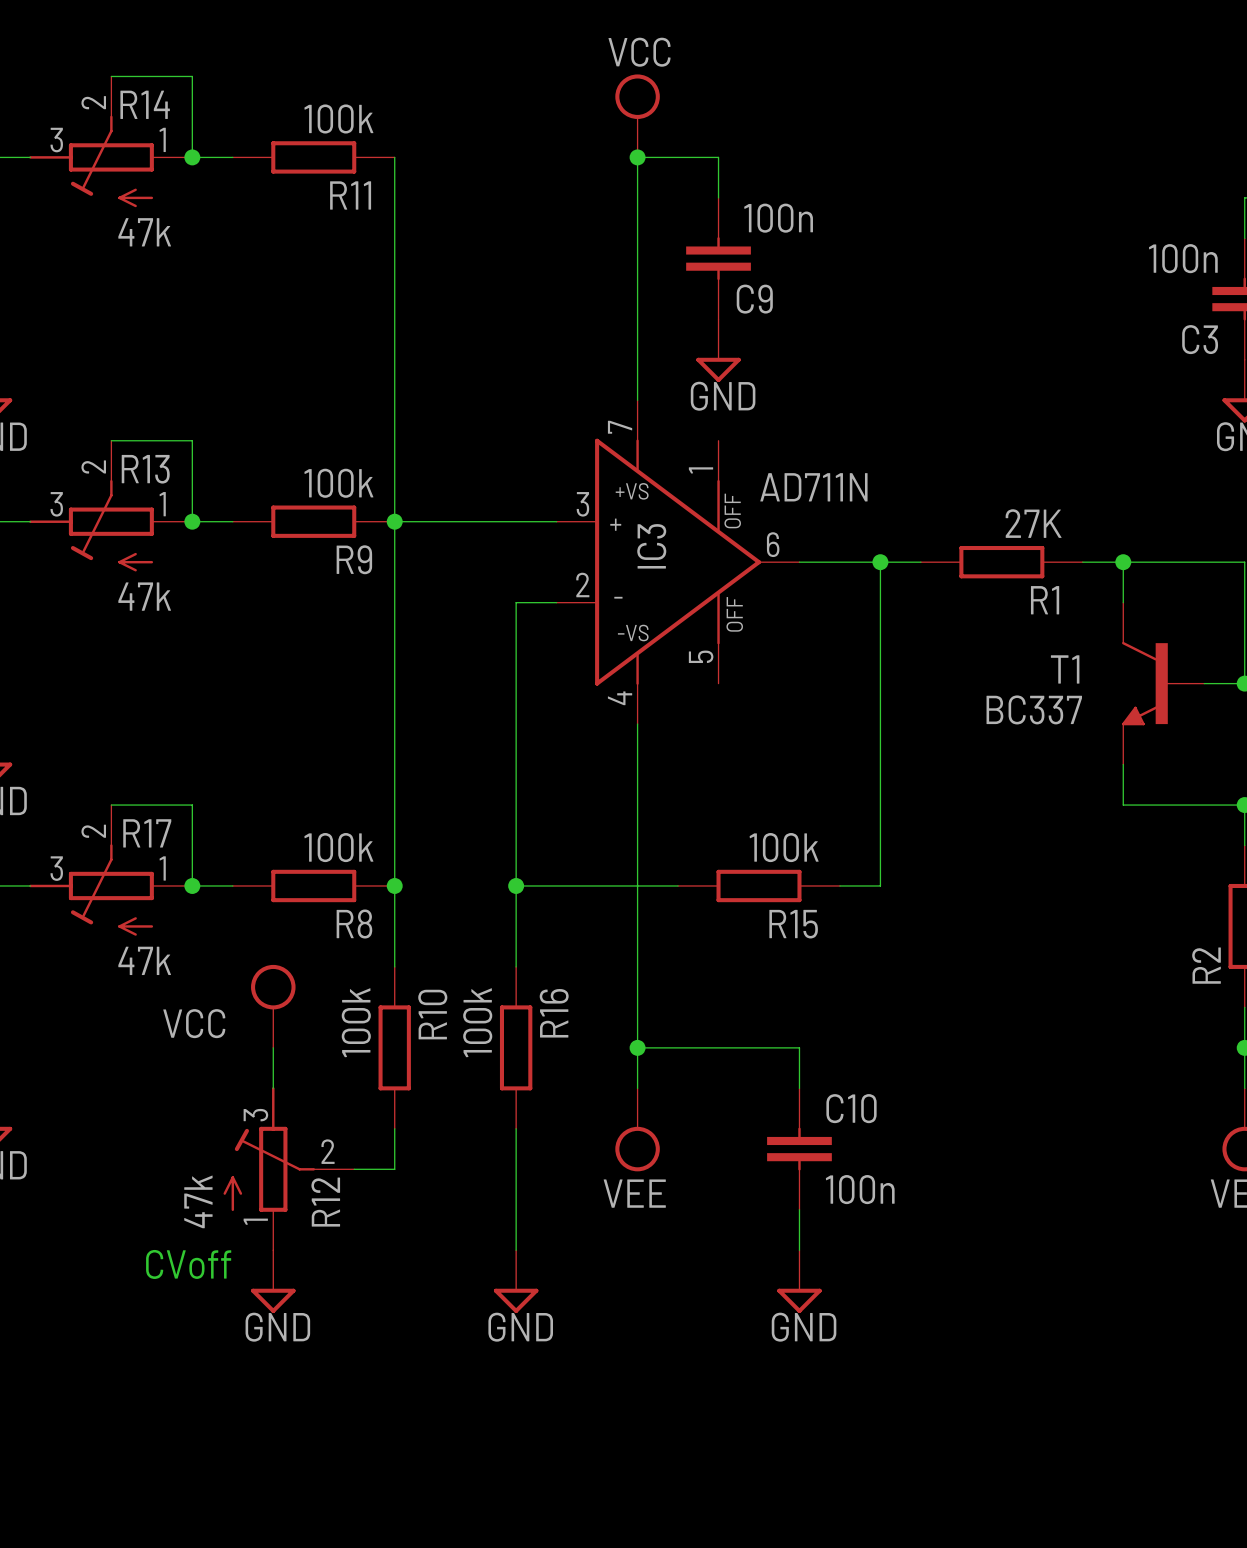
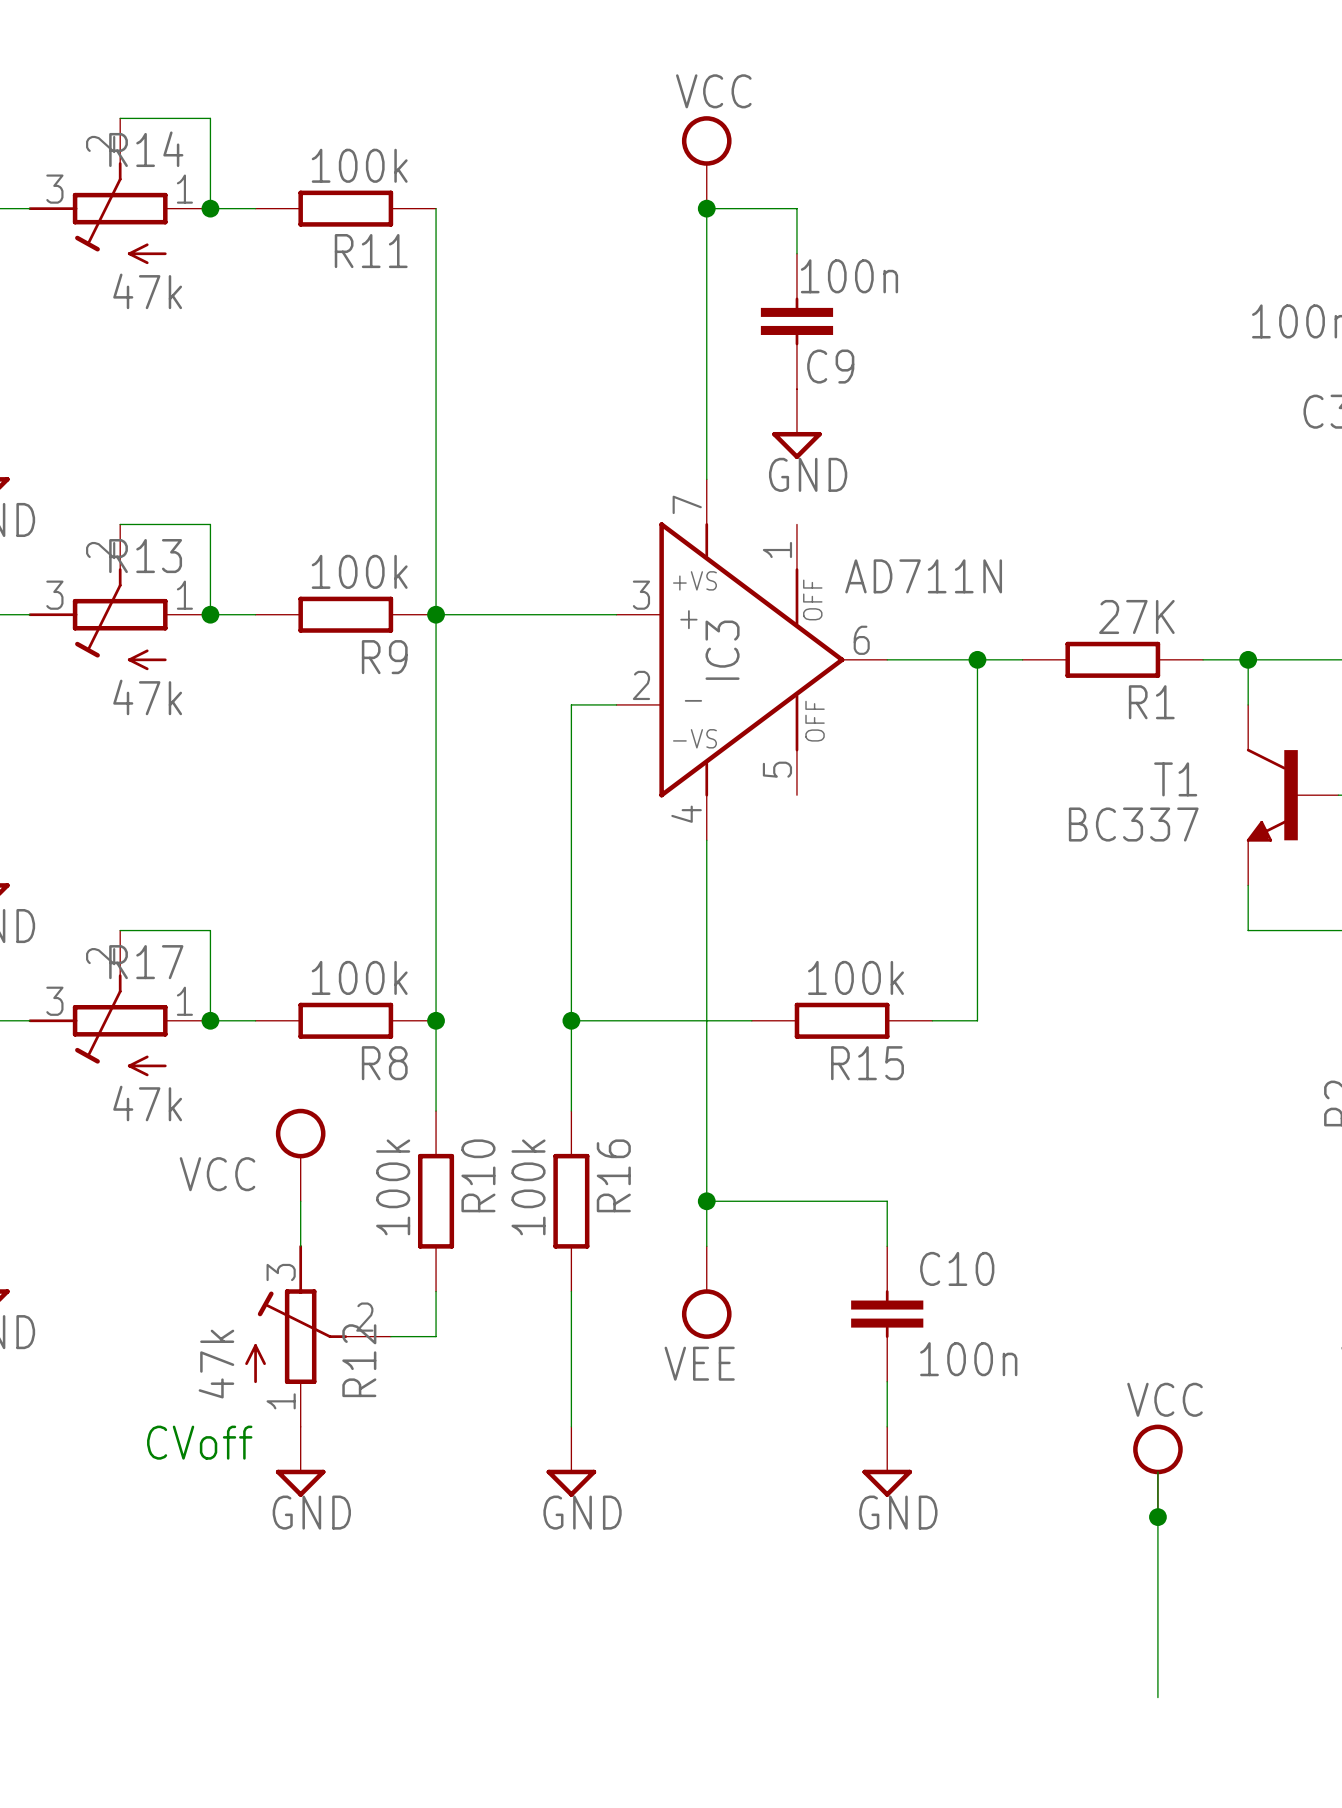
power symbol: none -> VCC (1157, 1470)
wire: none -> (1157, 1471) (1157, 1697)
junction: none -> (1157, 1517)

